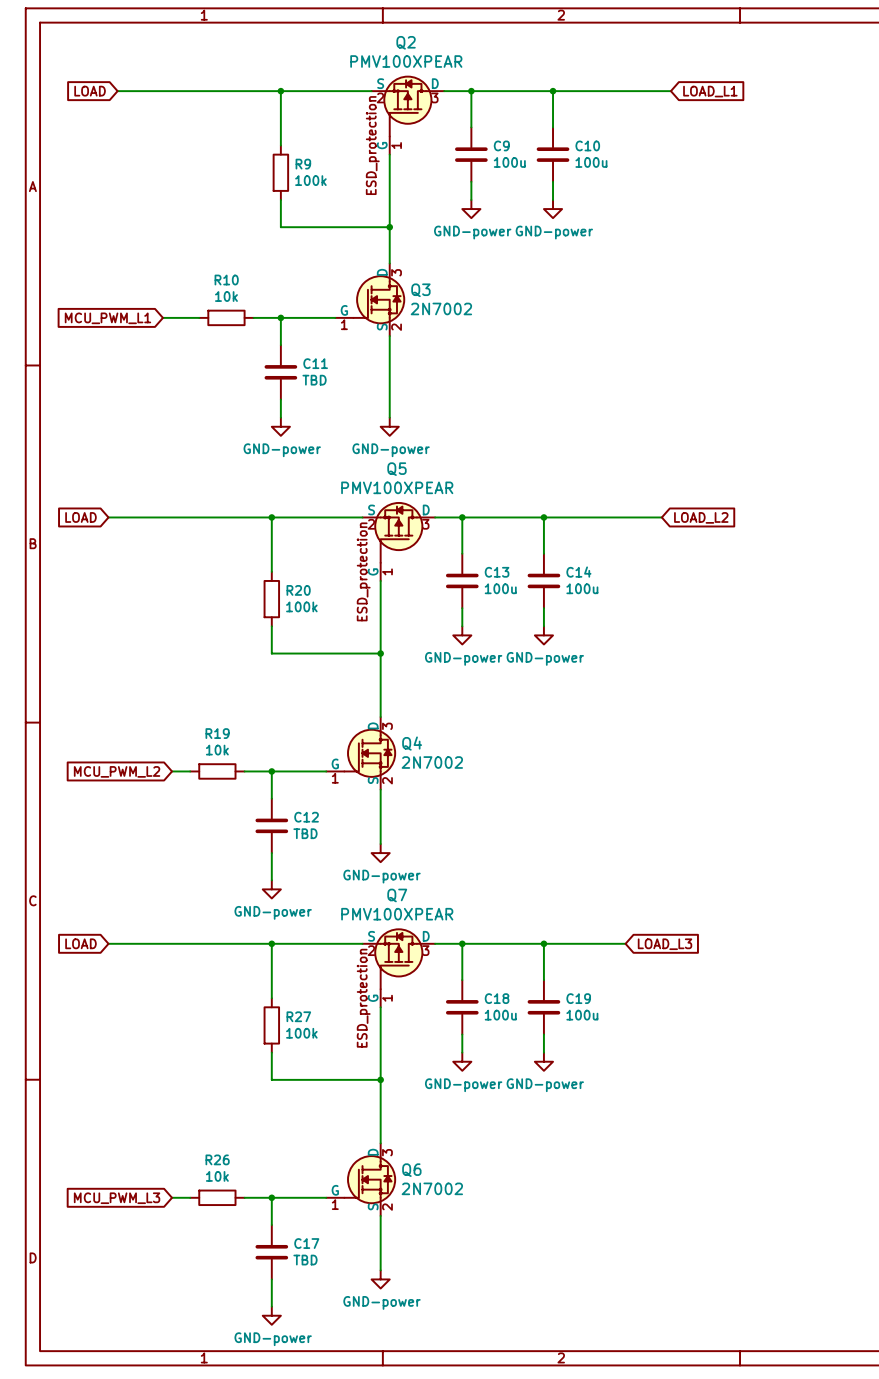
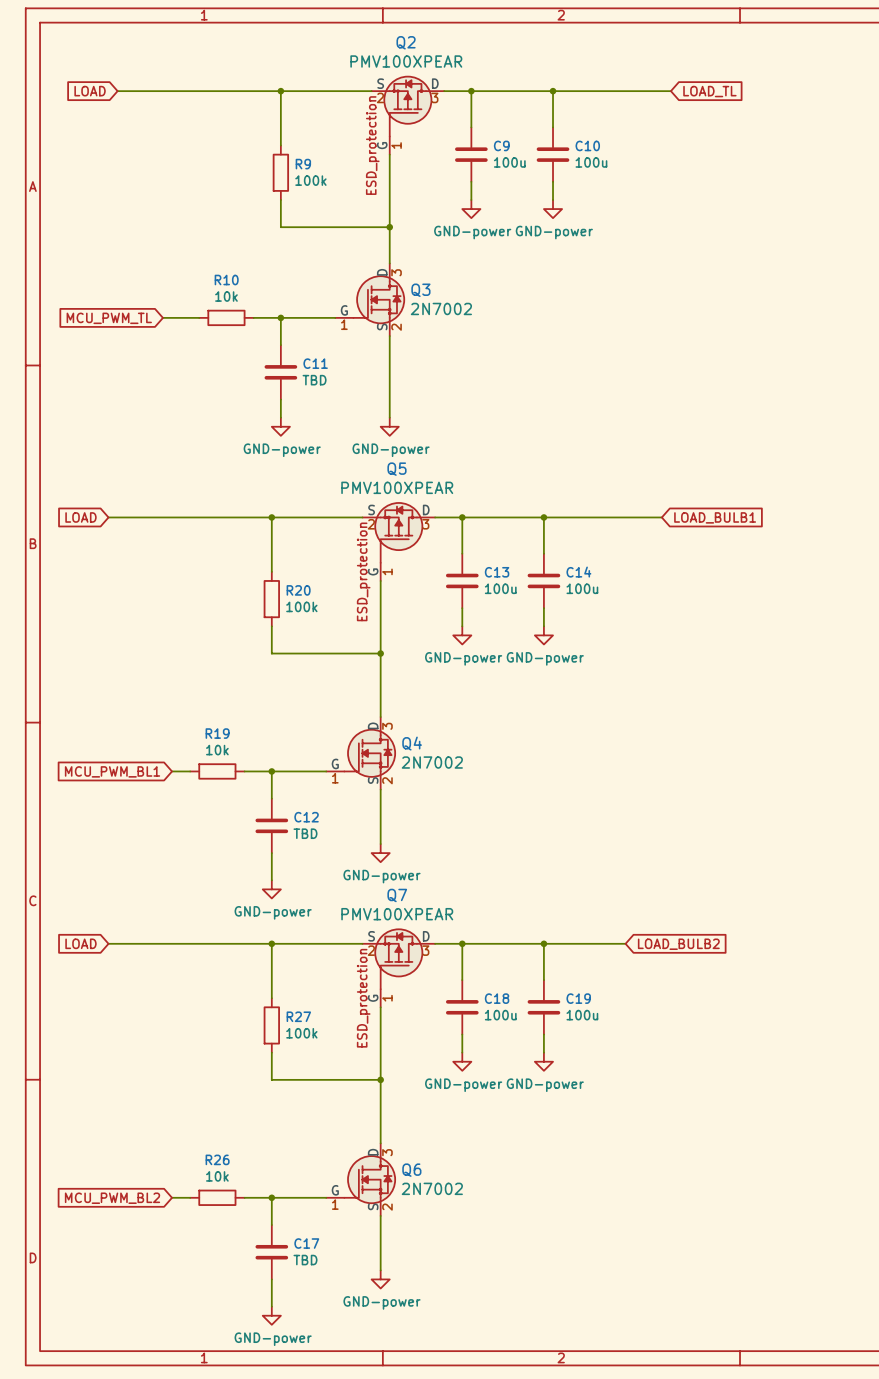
global label: LOAD_L1 (710, 91) -> LOAD_TL (709, 91)
global label: MCU_PWM_L1 (107, 318) -> MCU_PWM_TL (109, 318)
global label: LOAD_L2 (701, 517) -> LOAD_BULB1 (715, 517)
global label: MCU_PWM_L2 (117, 771) -> MCU_PWM_BL1 (112, 771)
global label: LOAD_L3 (665, 944) -> LOAD_BULB2 (678, 944)
global label: MCU_PWM_L3 (117, 1198) -> MCU_PWM_BL2 (112, 1198)

